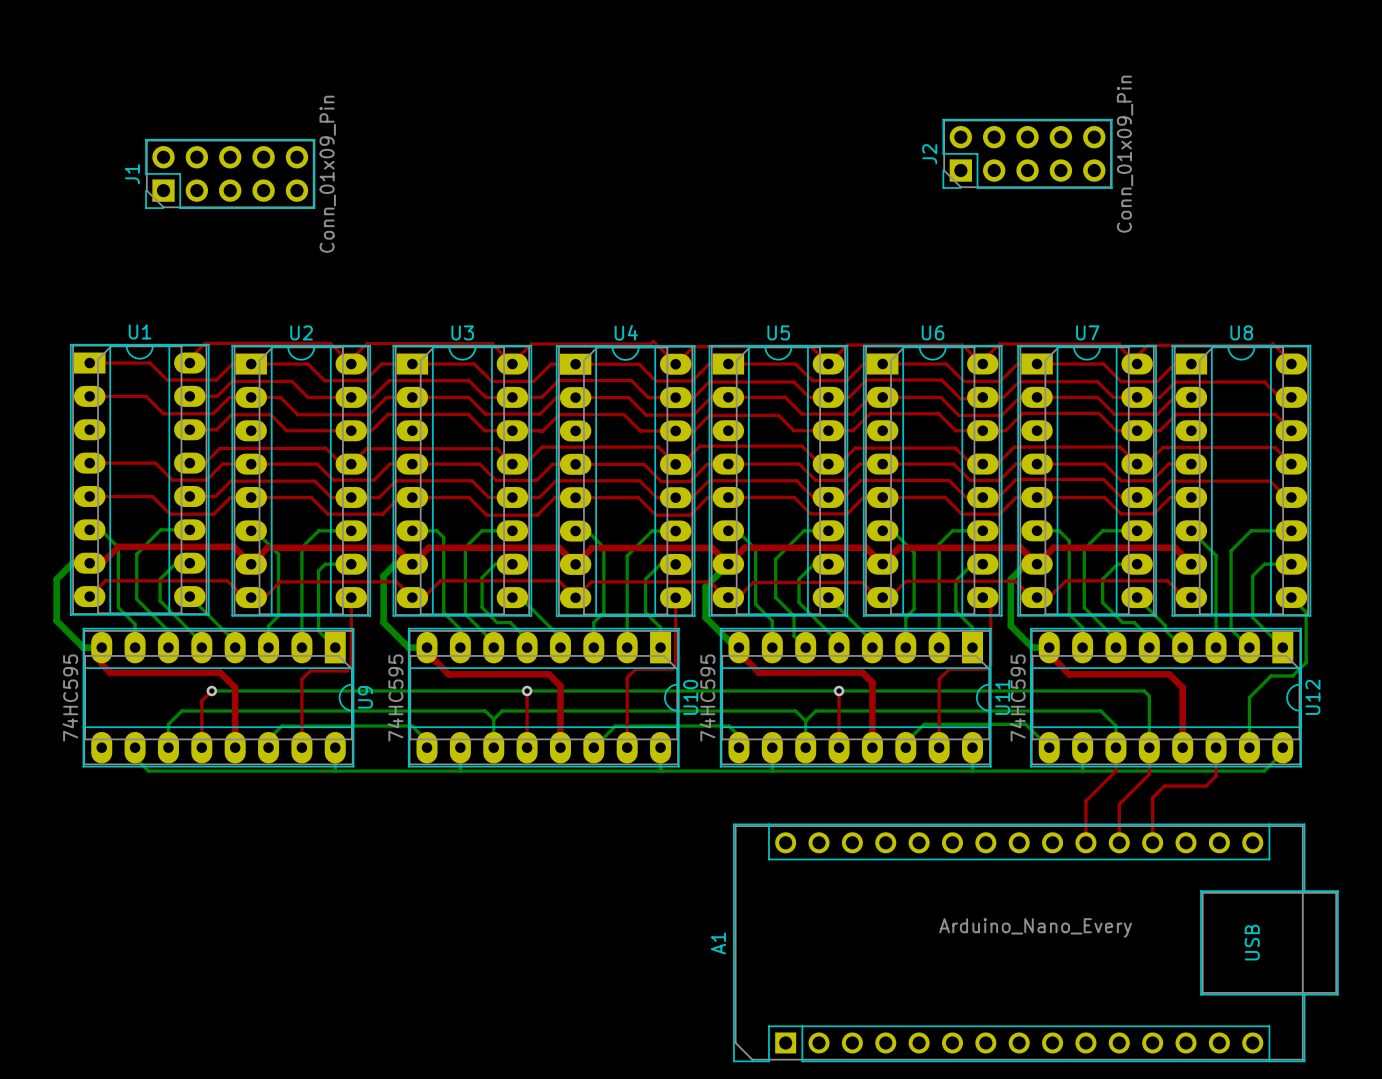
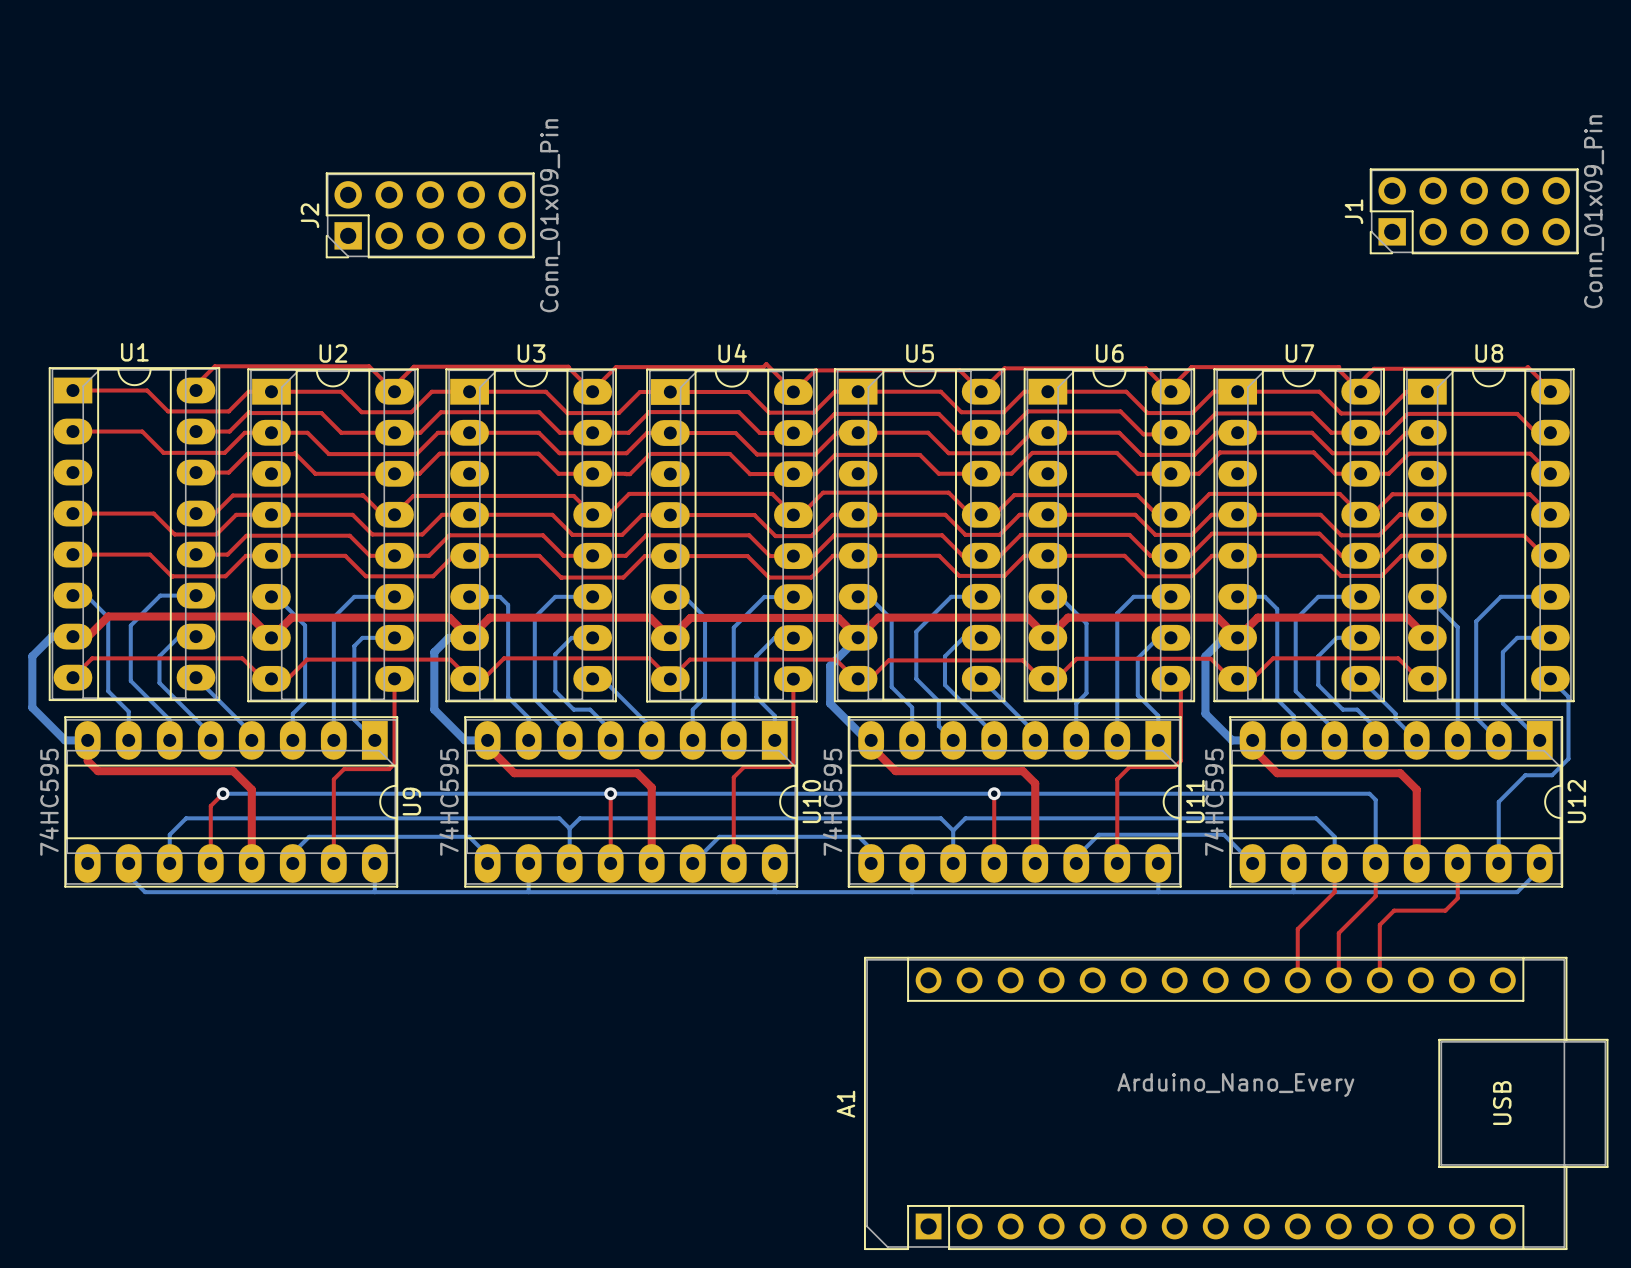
J2 position: (1027, 153) -> (430, 215)
J1 position: (230, 173) -> (1474, 211)

